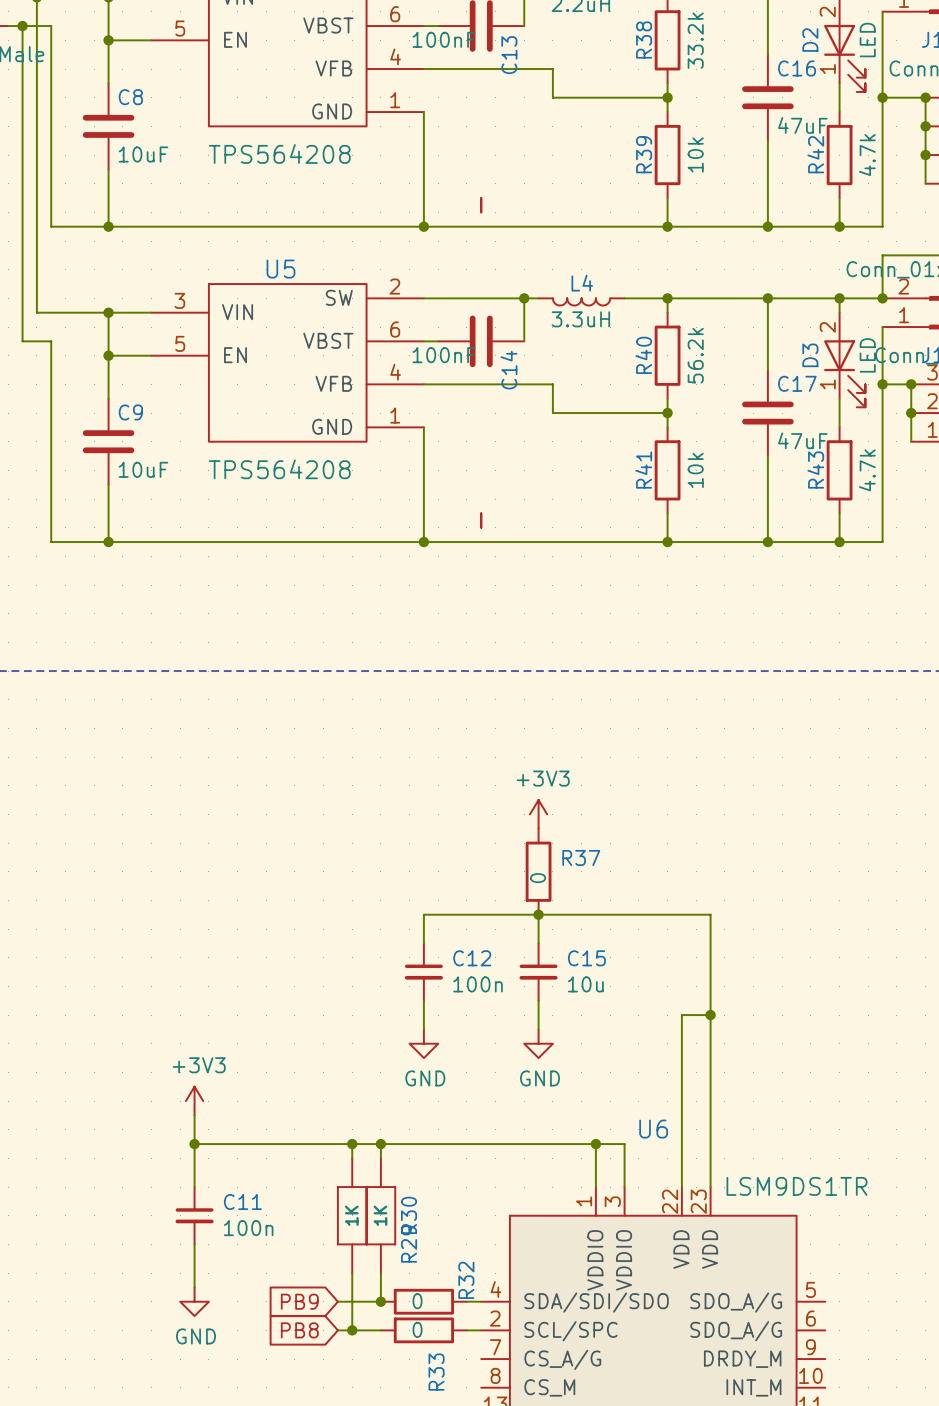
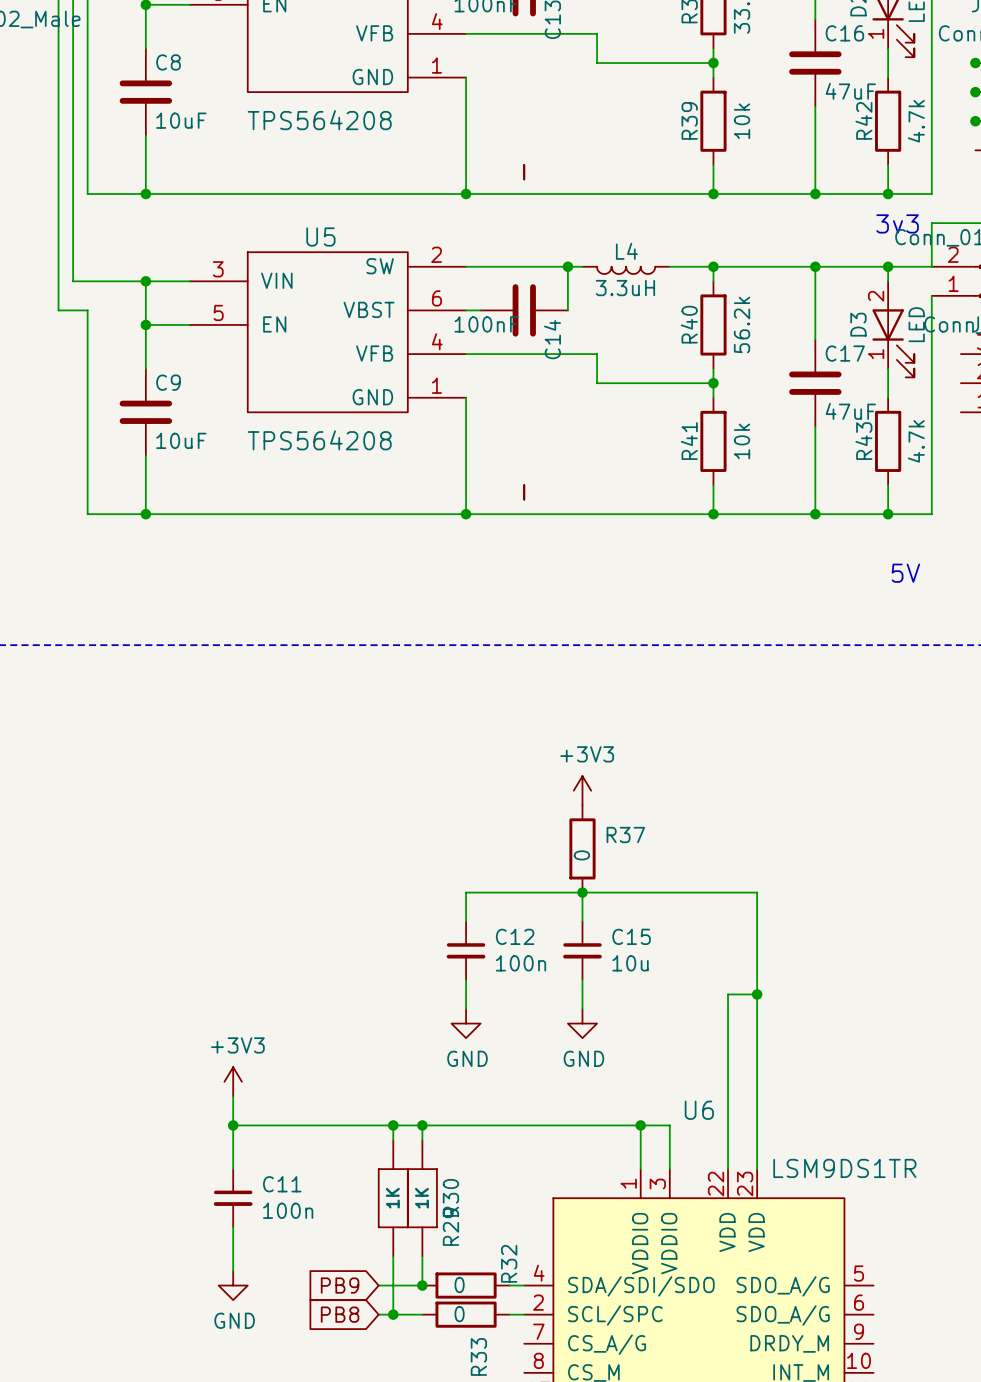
wire: (882, 97) (925, 97) (925, 183) -> none
junction: (882, 97) -> none
text: none -> 3v3 (897, 223)
junction: (882, 298) -> none
wire: (882, 384) (911, 384) (911, 441) -> none
junction: (882, 384) -> none
junction: (911, 384) -> none
junction: (911, 413) -> none
text: none -> 5V (905, 573)

